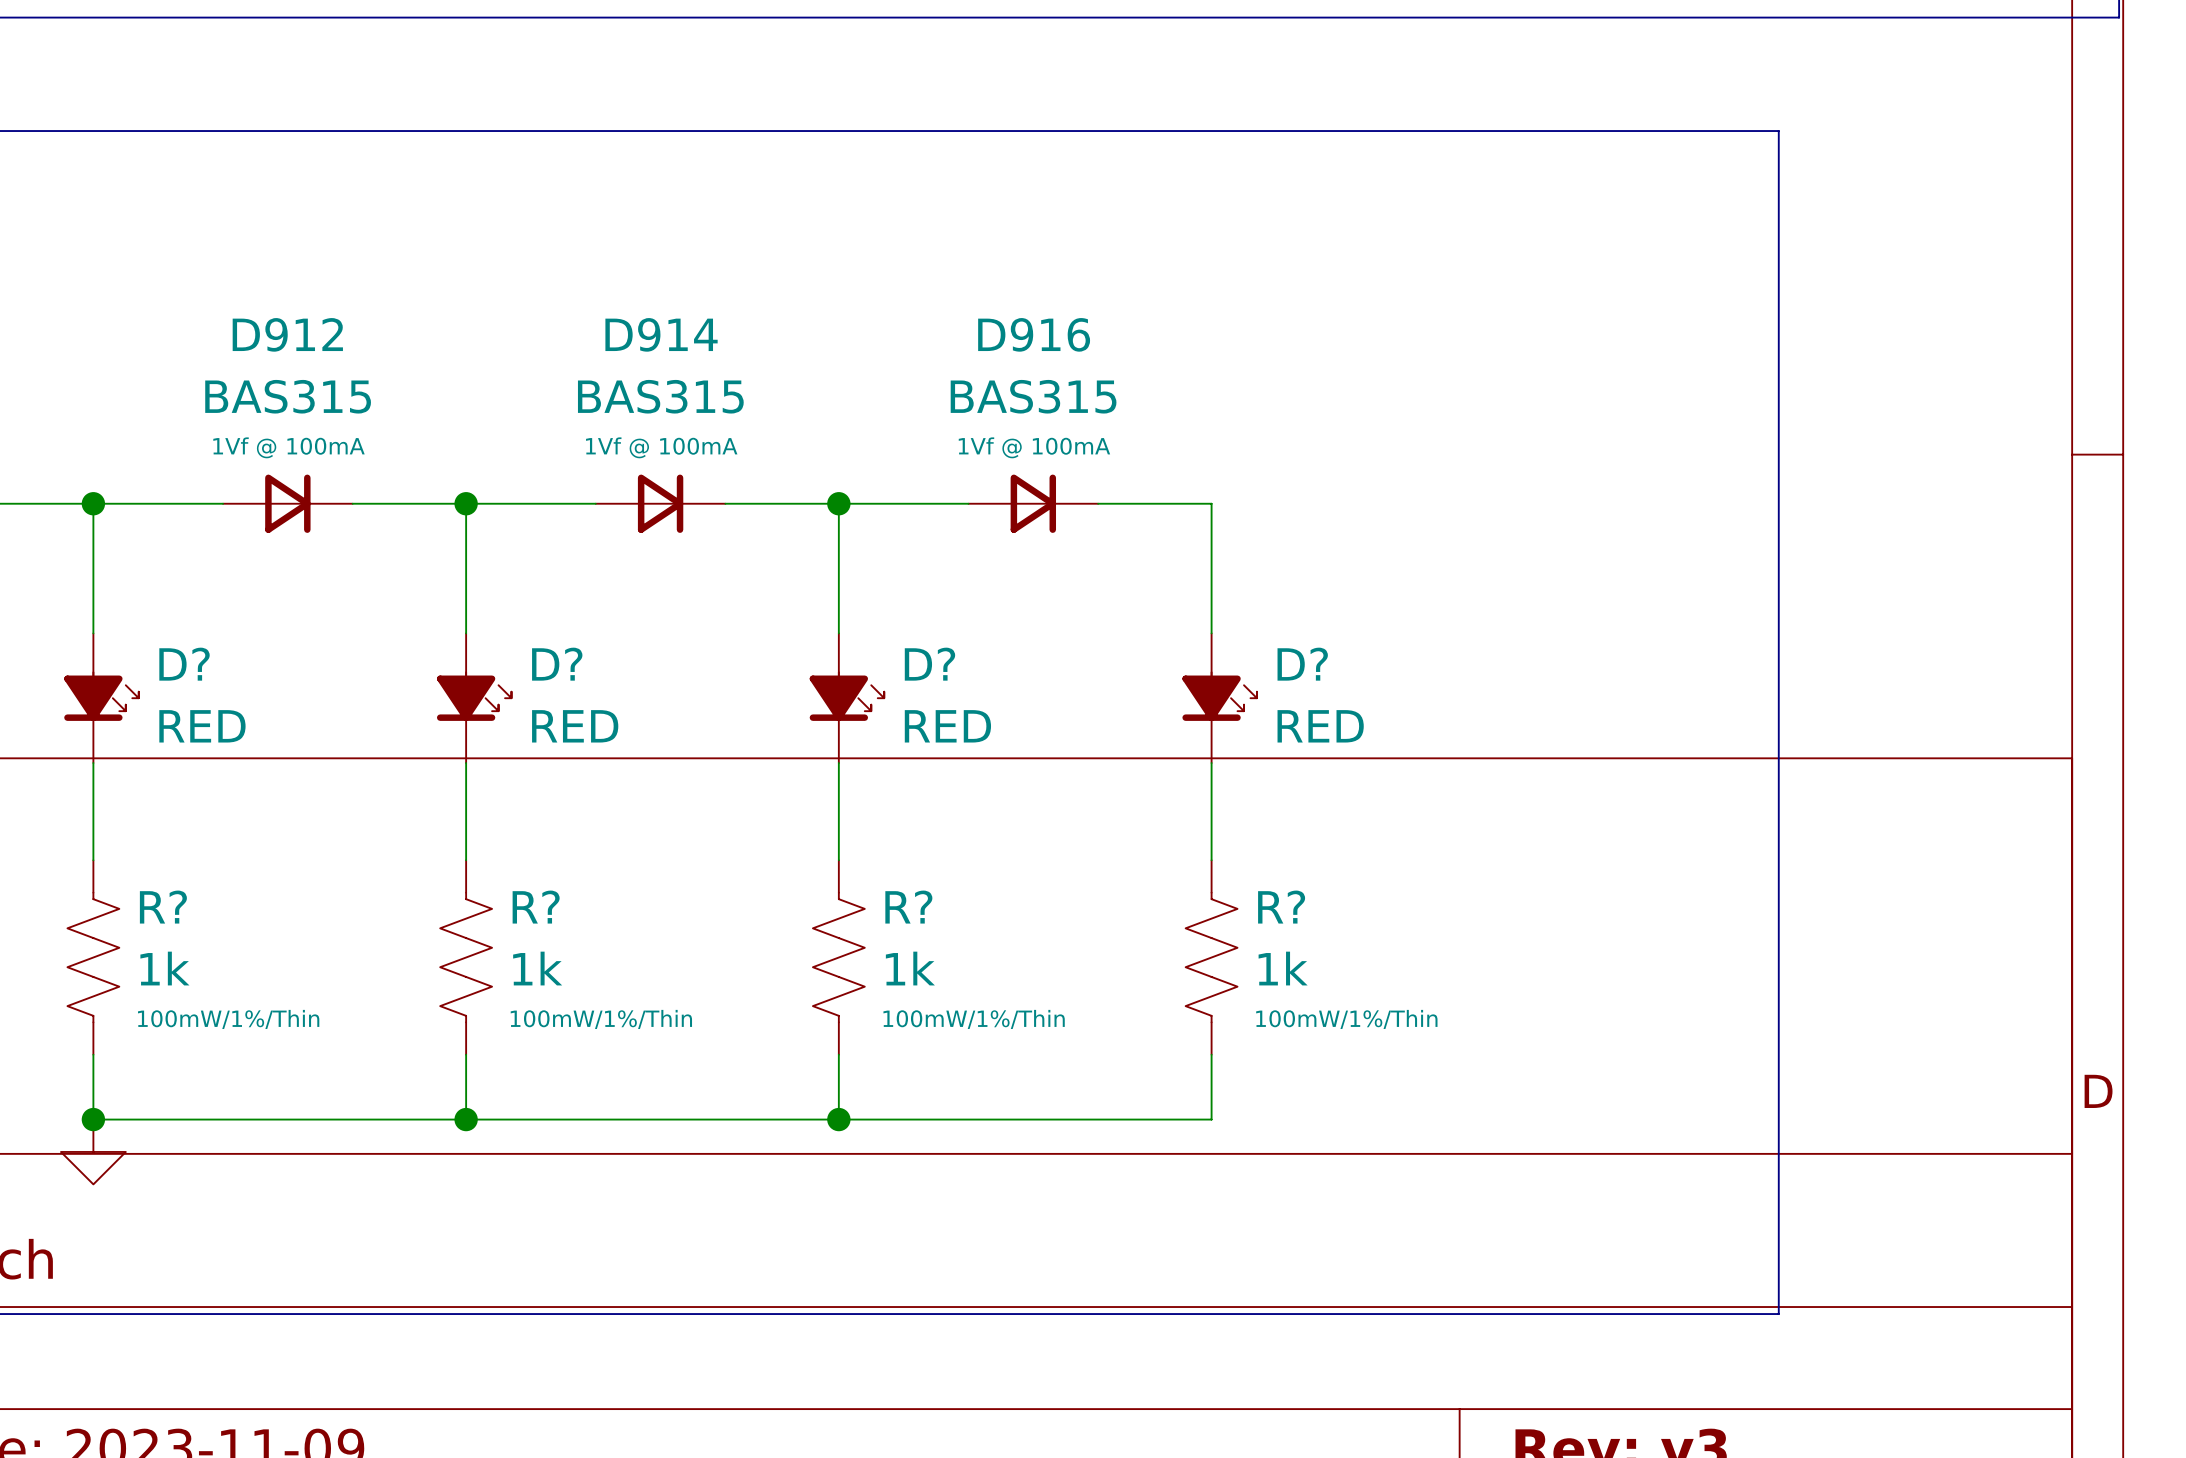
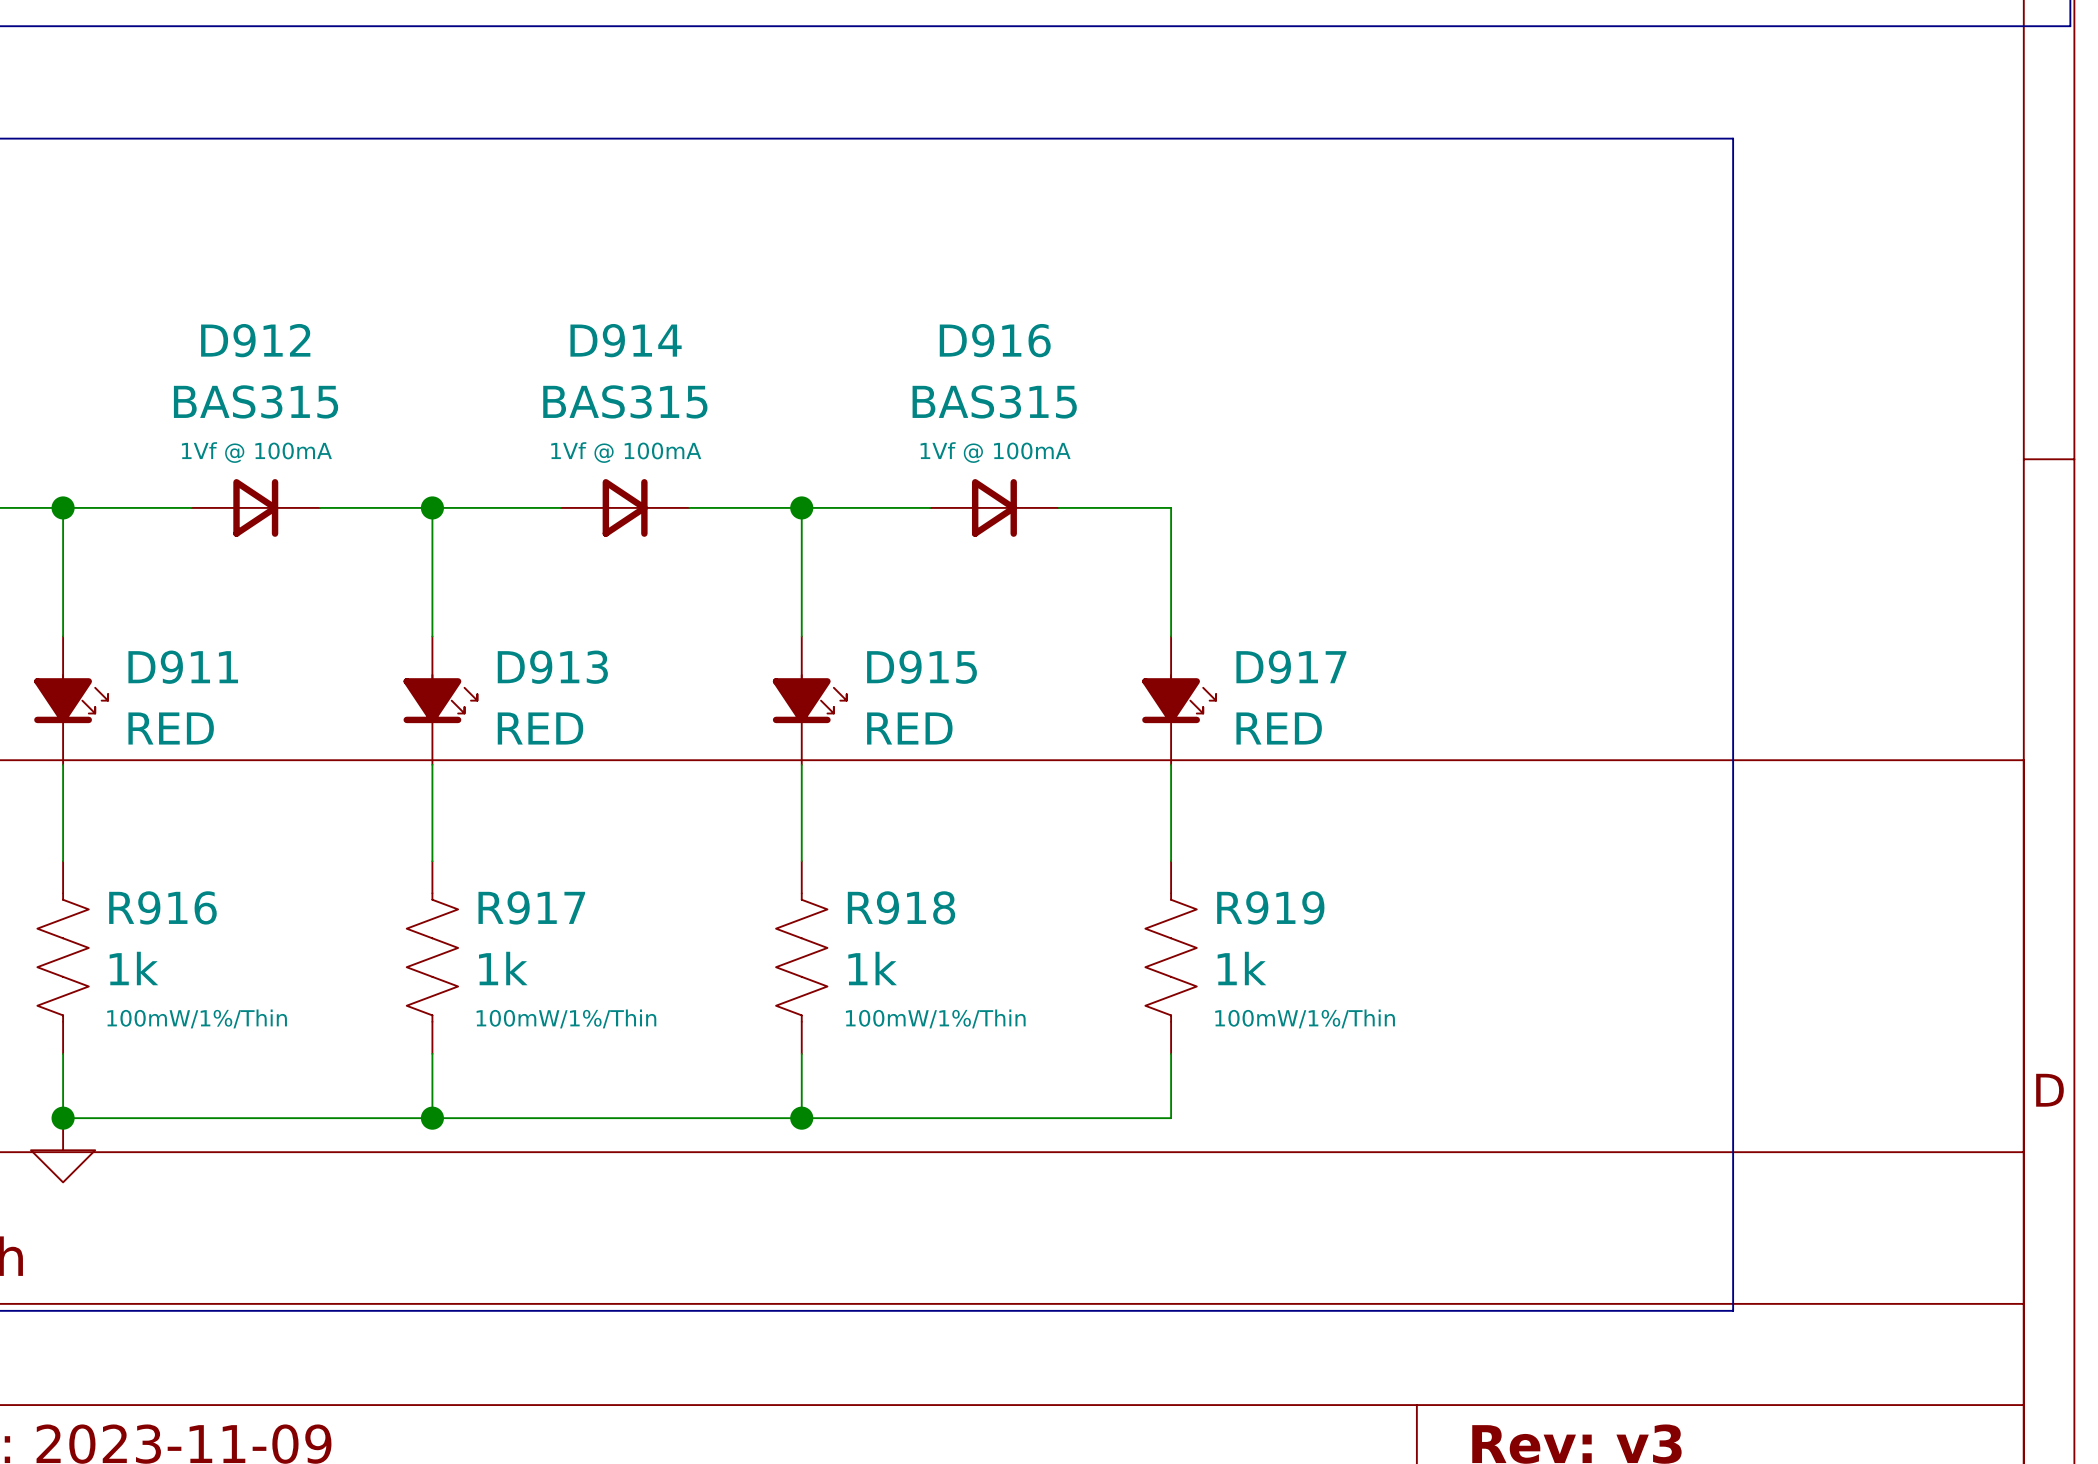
D? name: D? (184, 664) -> D911 (183, 667)
D? name: D? (557, 664) -> D913 (552, 667)
D? name: D? (929, 664) -> D915 (922, 667)
D? name: D? (1302, 664) -> D917 (1291, 667)
R? name: R? (163, 907) -> R916 (162, 907)
R? name: R? (536, 907) -> R917 (531, 907)
R? name: R? (908, 907) -> R918 (901, 907)
R? name: R? (1281, 907) -> R919 (1270, 907)

